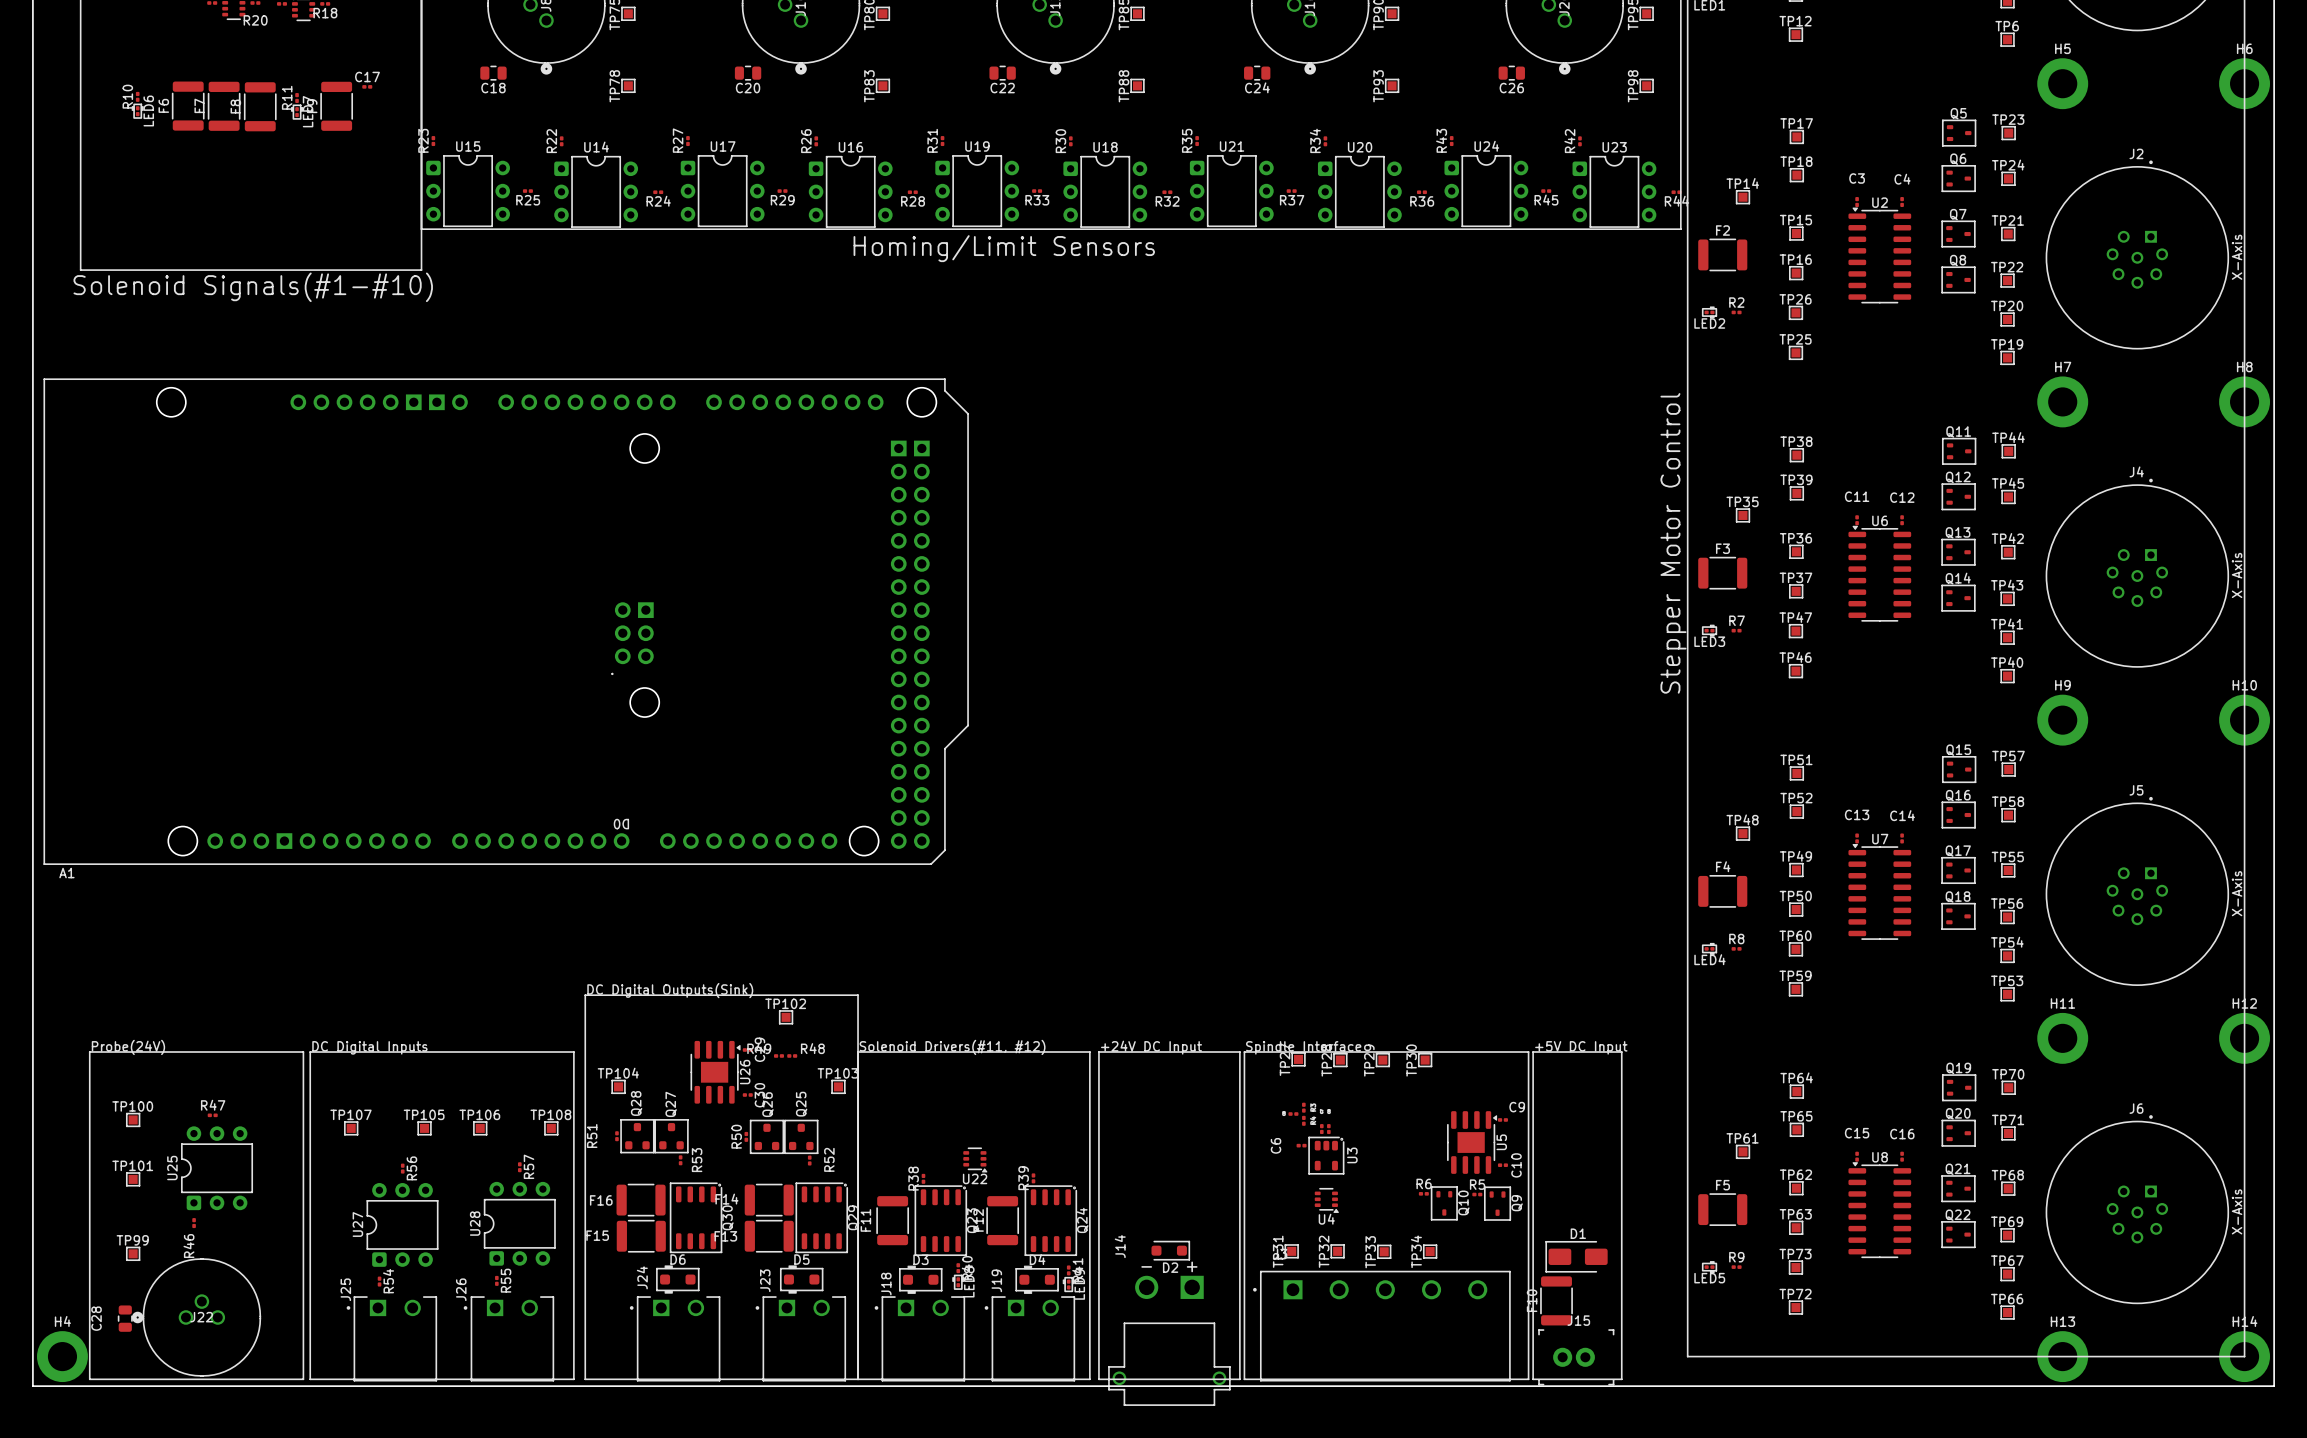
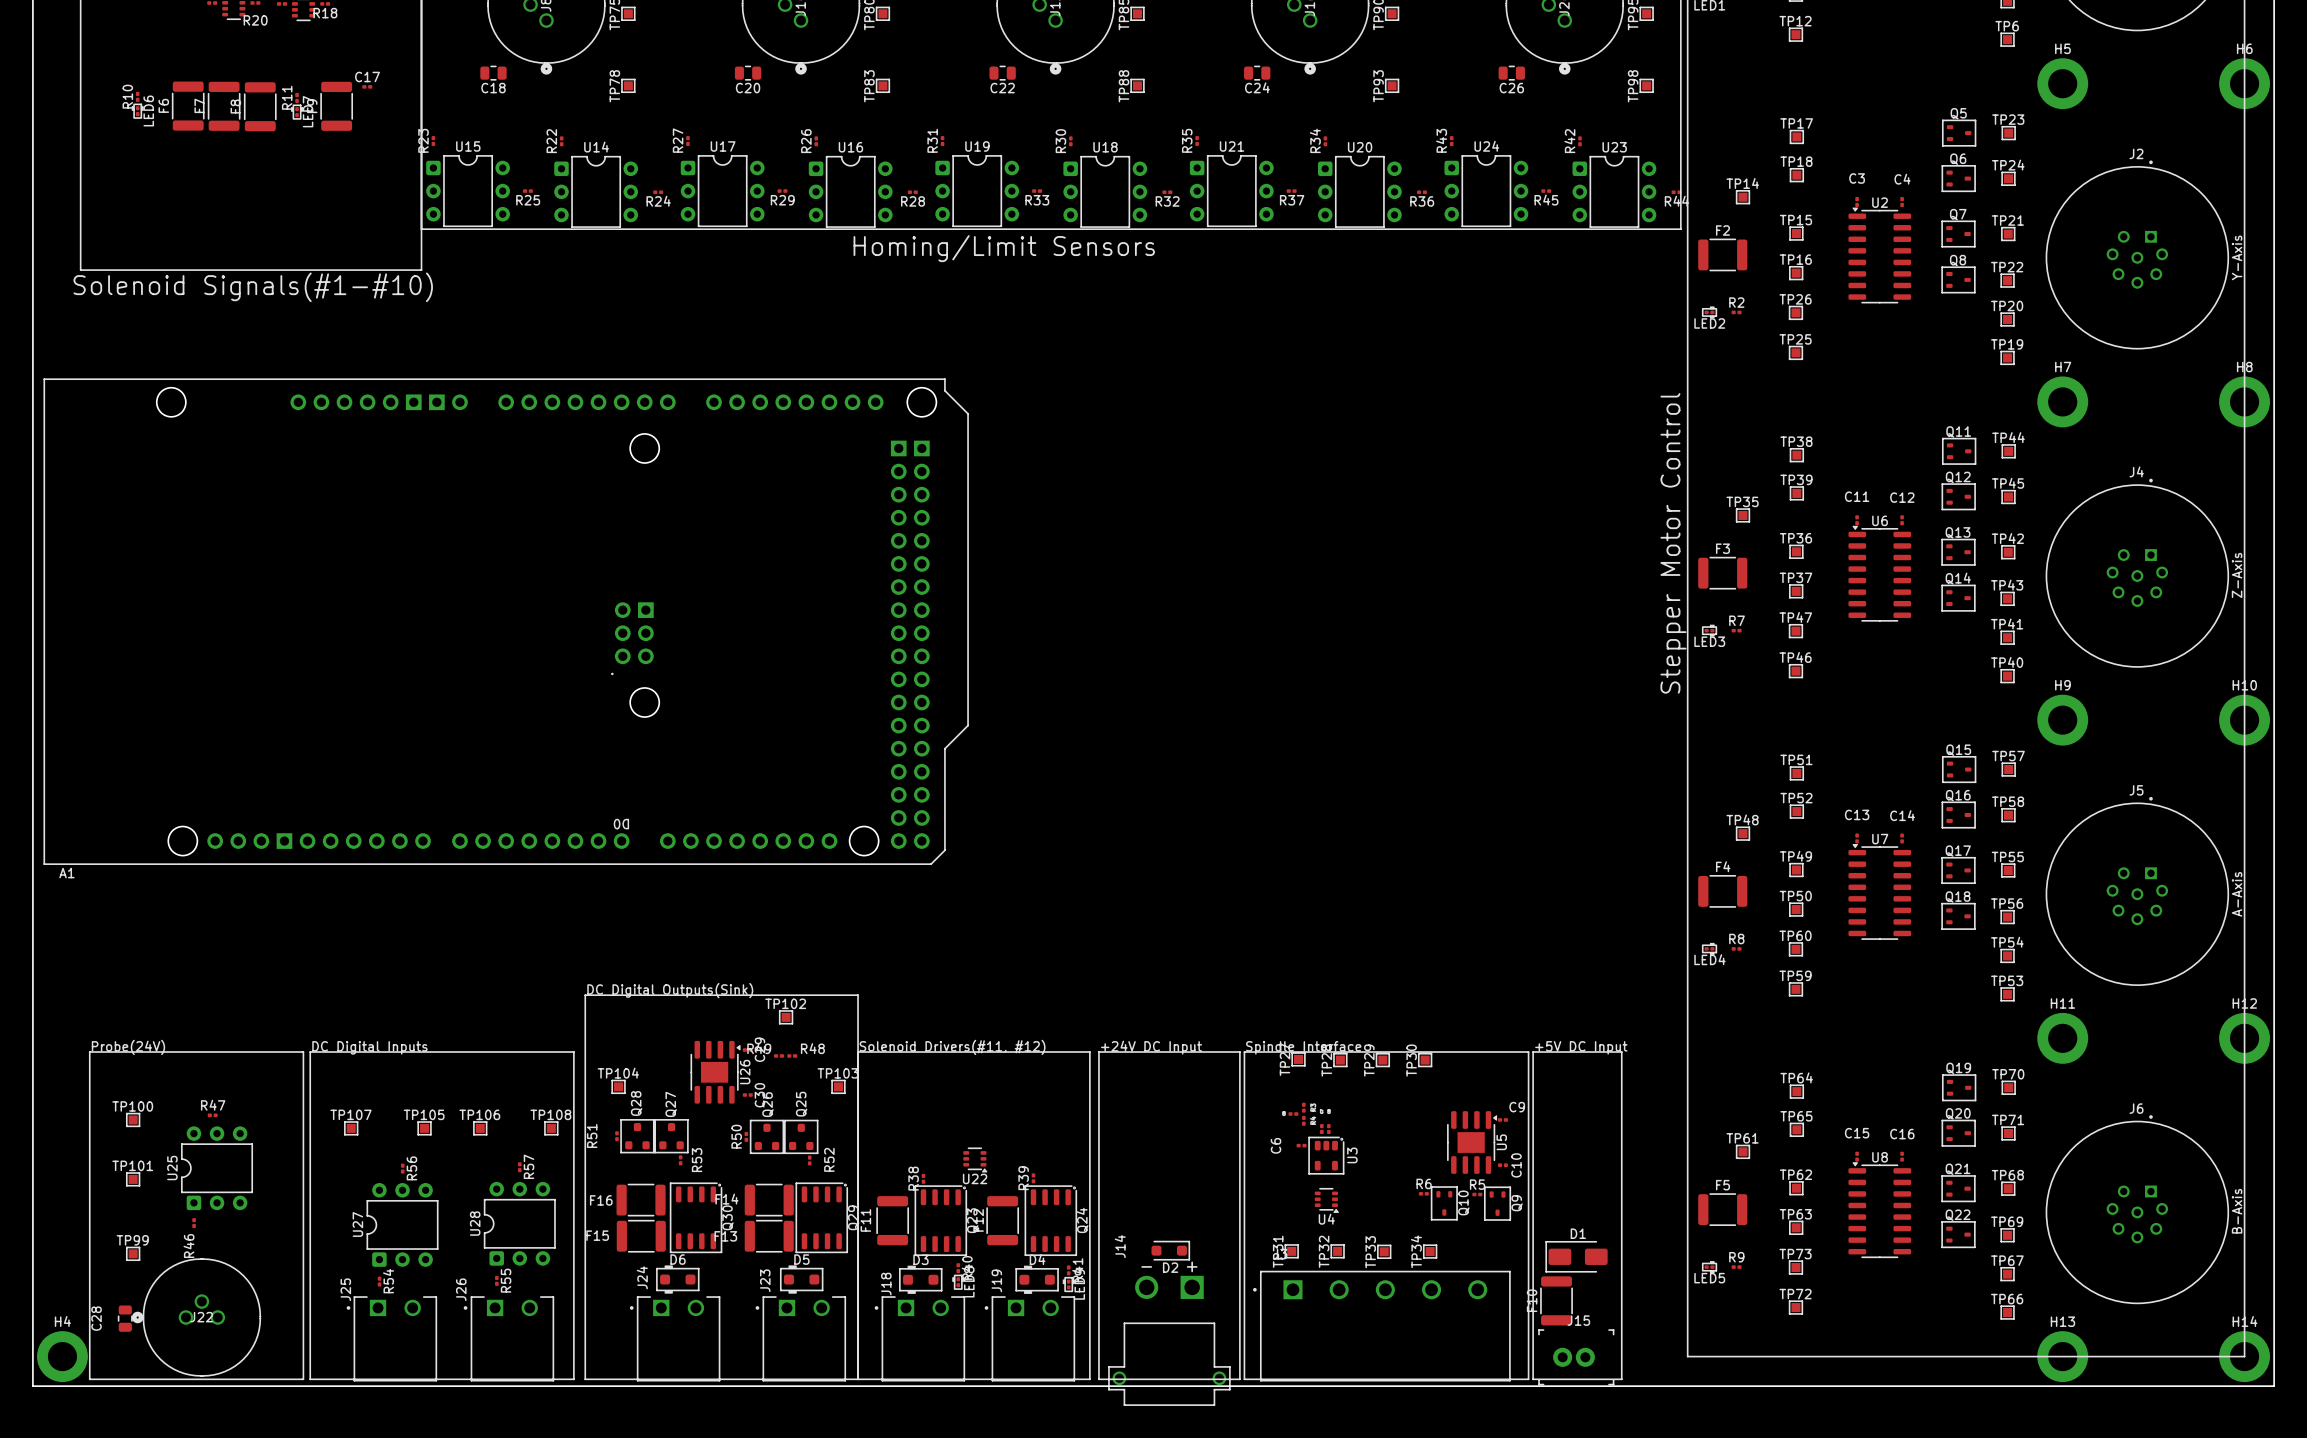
text: X-Axis (2237, 257) -> Y-Axis (2237, 257)
text: X-Axis (2237, 575) -> Z-Axis (2237, 575)
text: X-Axis (2237, 893) -> A-Axis (2237, 894)
text: X-Axis (2237, 1211) -> B-Axis (2237, 1211)

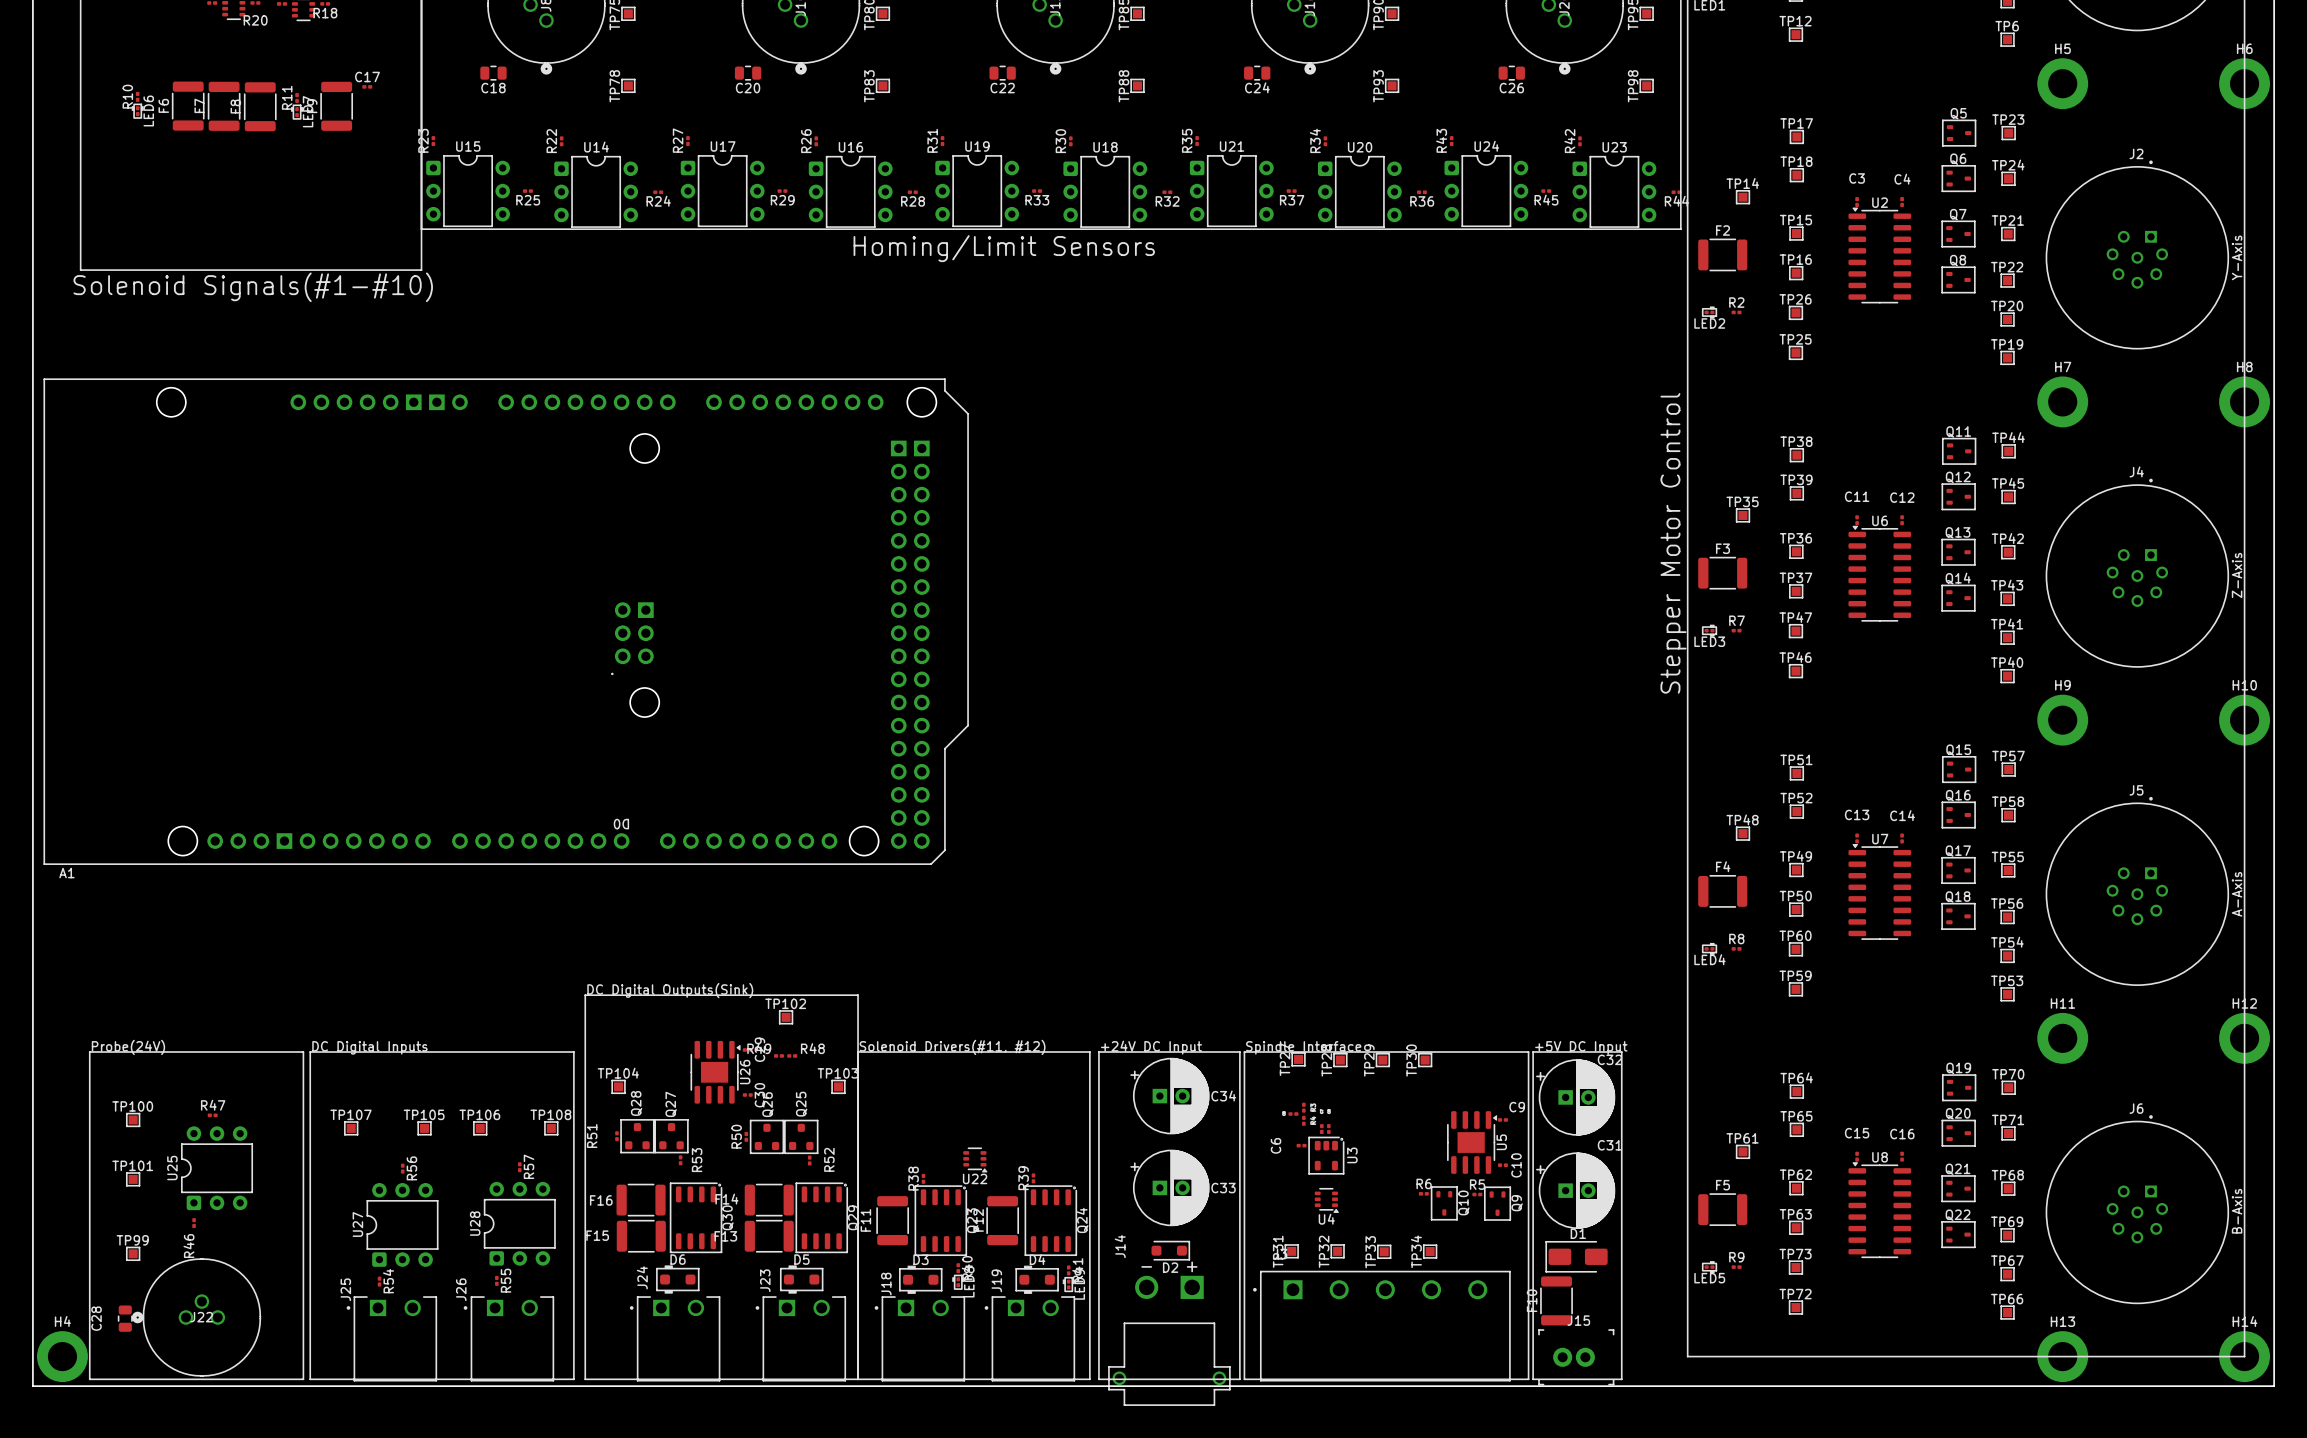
C34: none -> (1169, 1096)
C32: none -> (1575, 1097)
C33: none -> (1169, 1187)
C31: none -> (1575, 1190)

